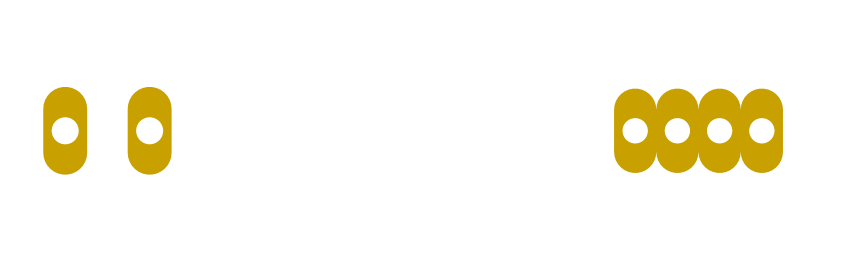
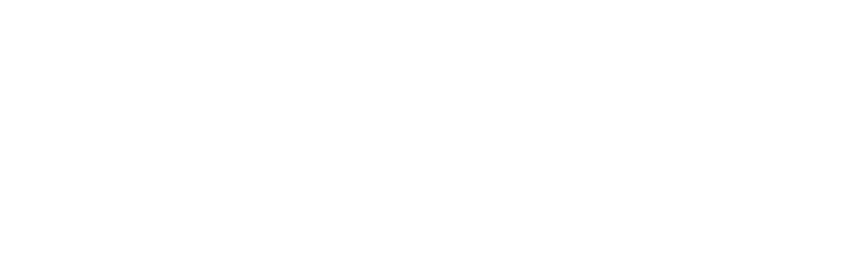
part: (107, 130) -> none
part: (698, 130) -> none

